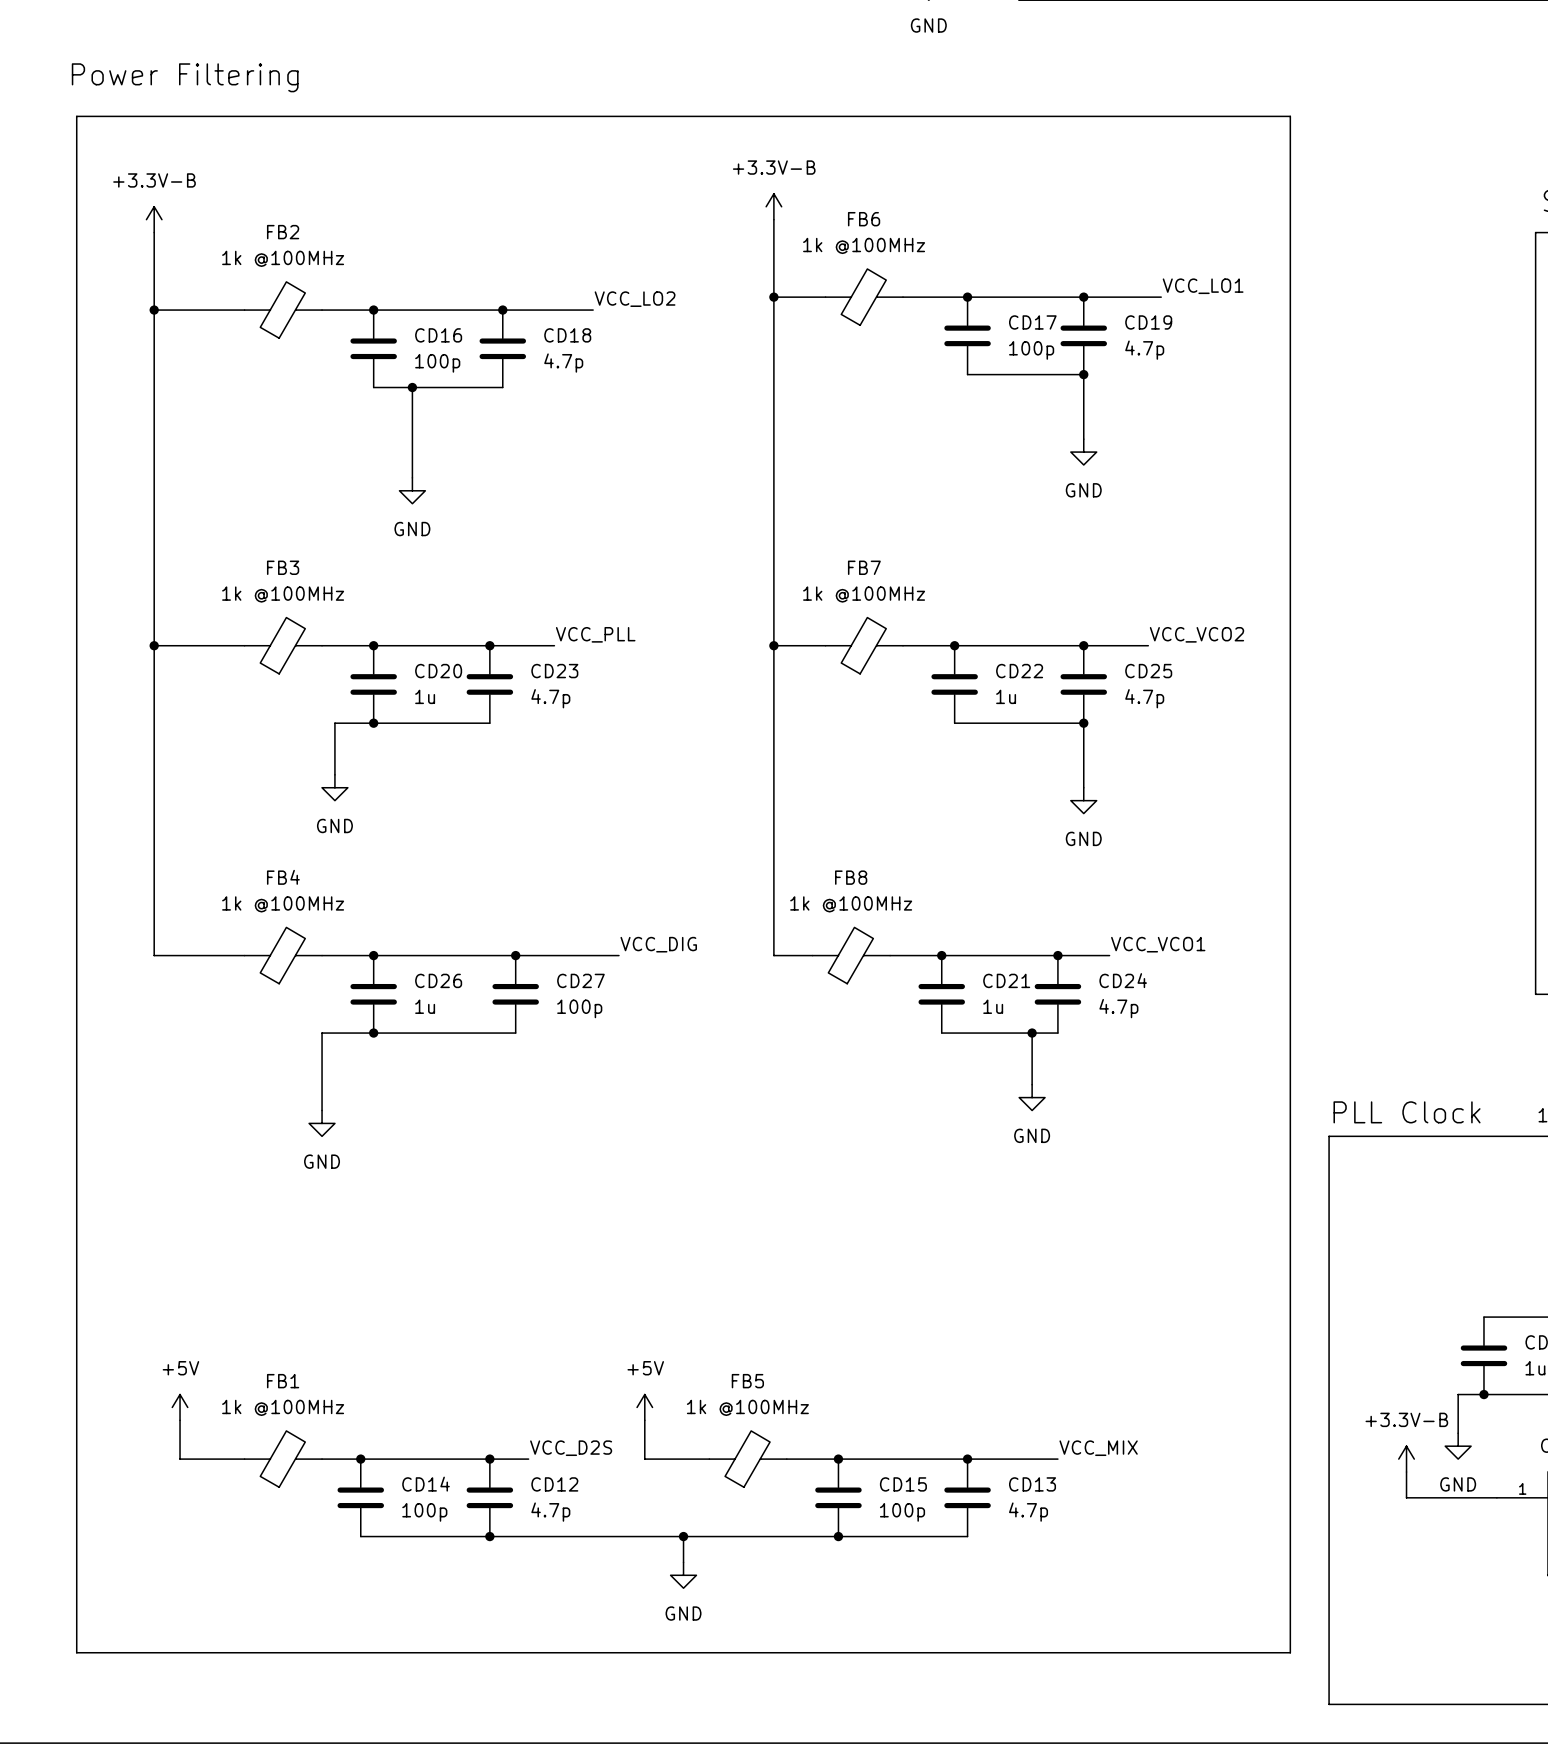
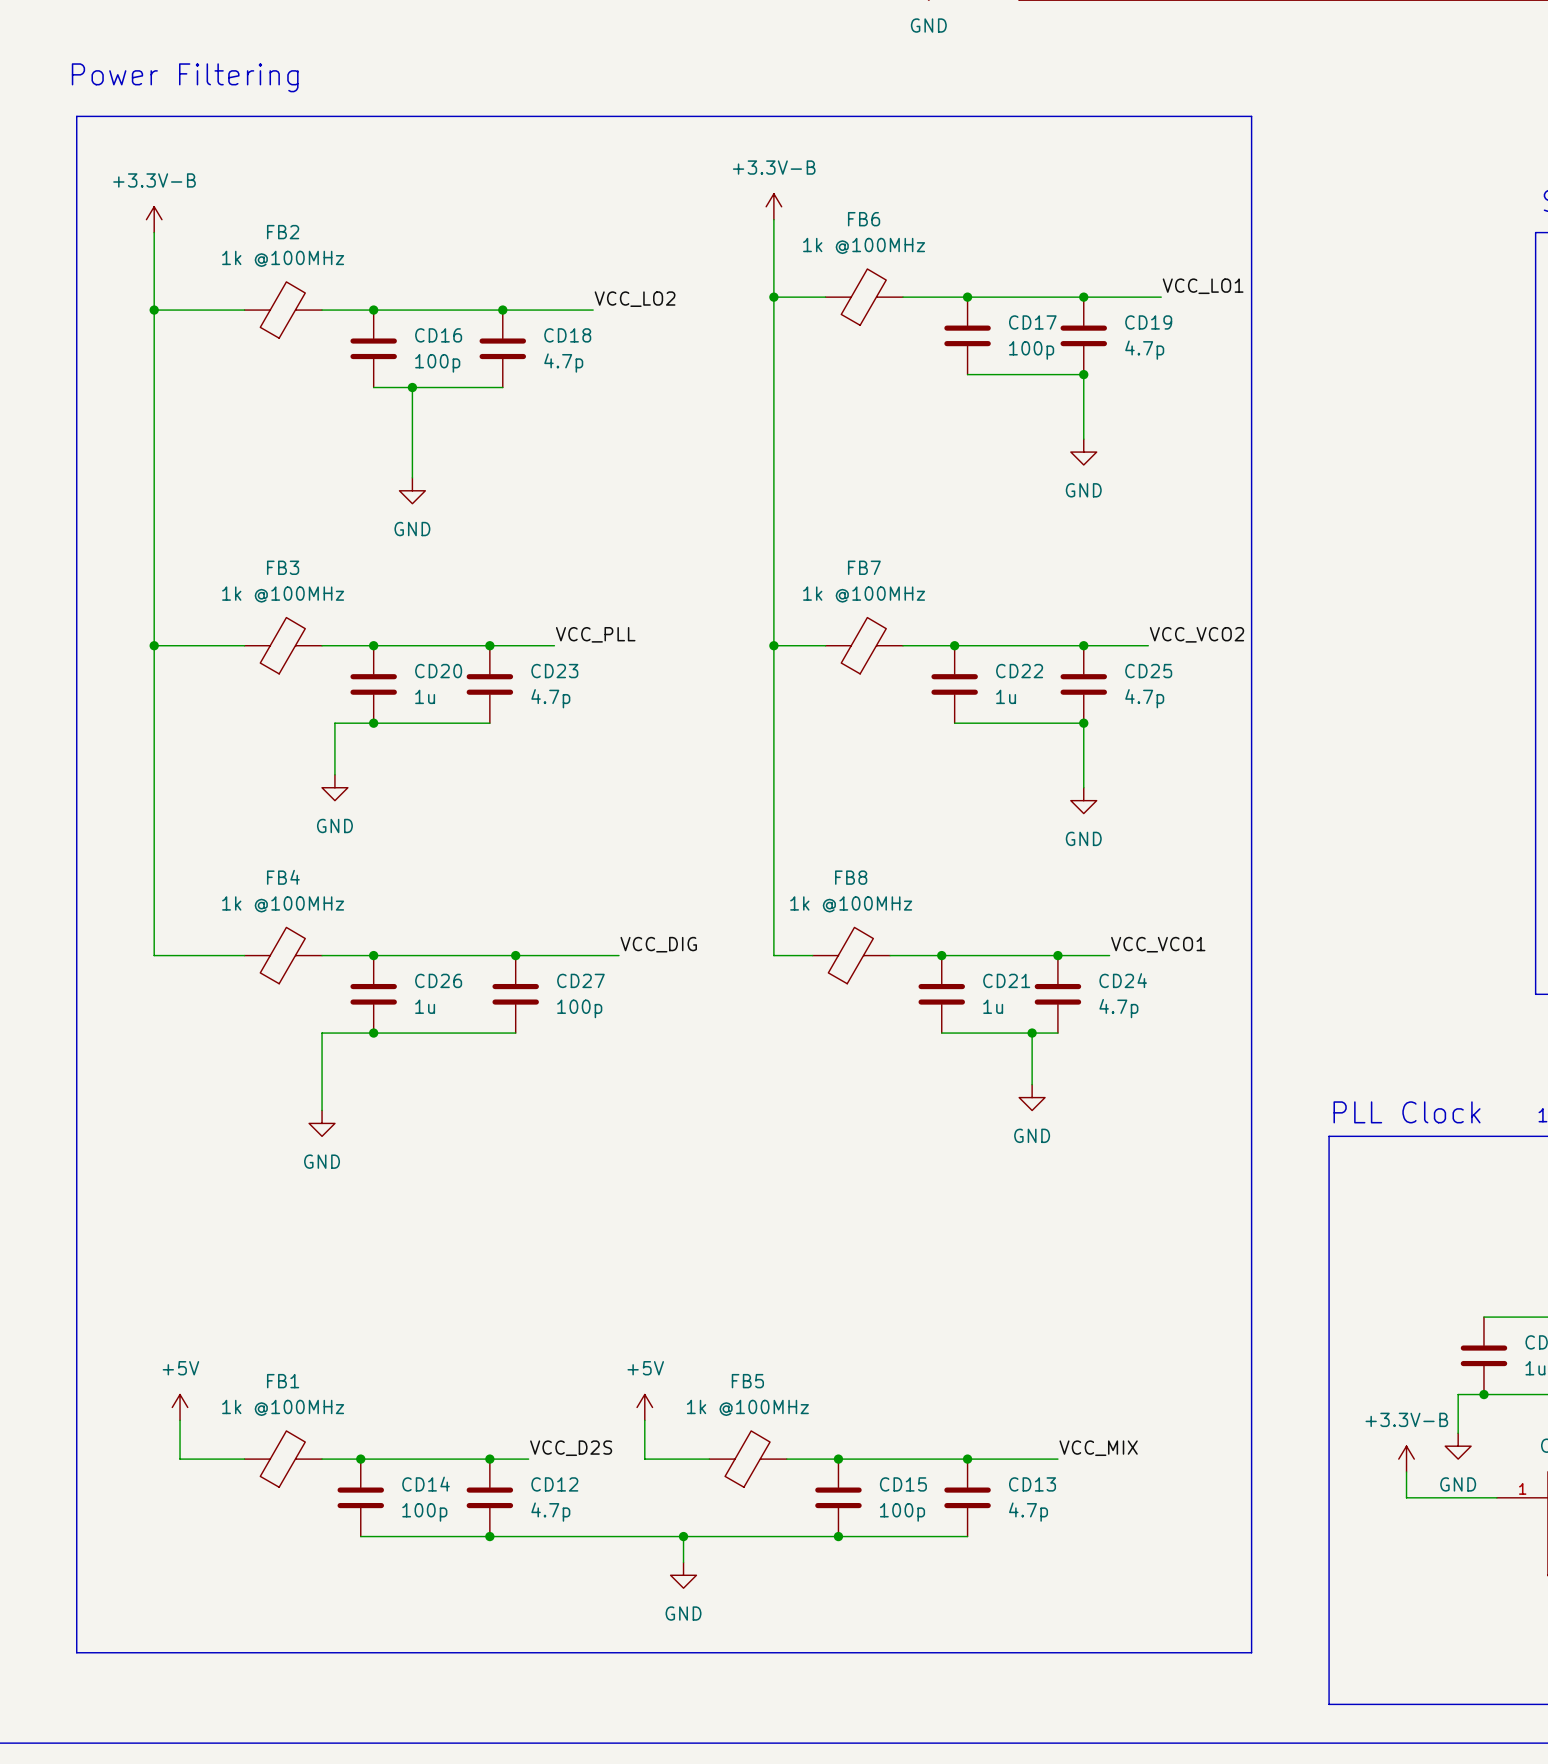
line: (1251, 116) (1290, 116) (1290, 1652) (1251, 1652) -> (1251, 116) (1251, 1652)

